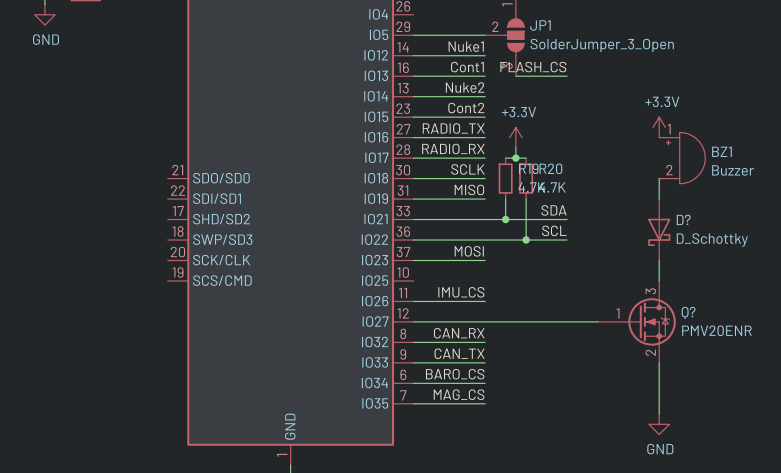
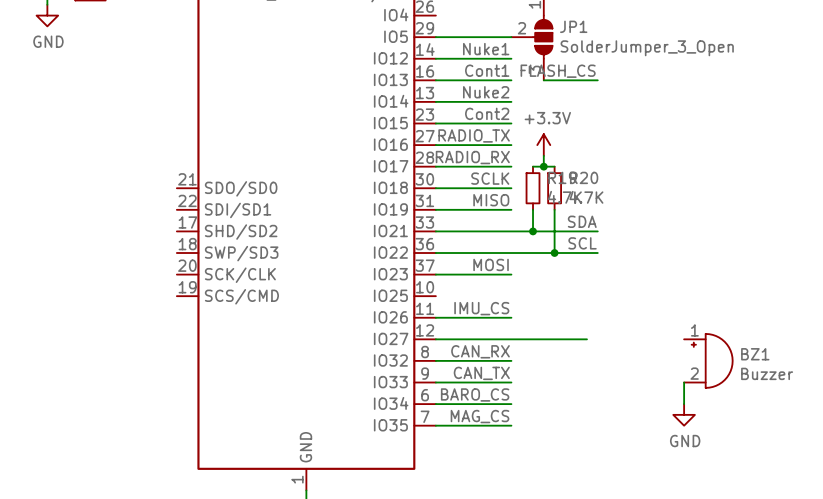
power symbol: +3.3V (659, 127) -> none
BZ1 position: (682, 158) -> (708, 360)
wire: (659, 178) (659, 199) -> none
D?: D_Schottky (659, 229) -> none
wire: (659, 260) (659, 280) -> (684, 382) (684, 404)
wire: (556, 321) (597, 321) -> none
Q?: PMV20ENR (636, 321) -> none
wire: (659, 362) (659, 414) -> none
power symbol position: GND (659, 424) -> GND (684, 414)

